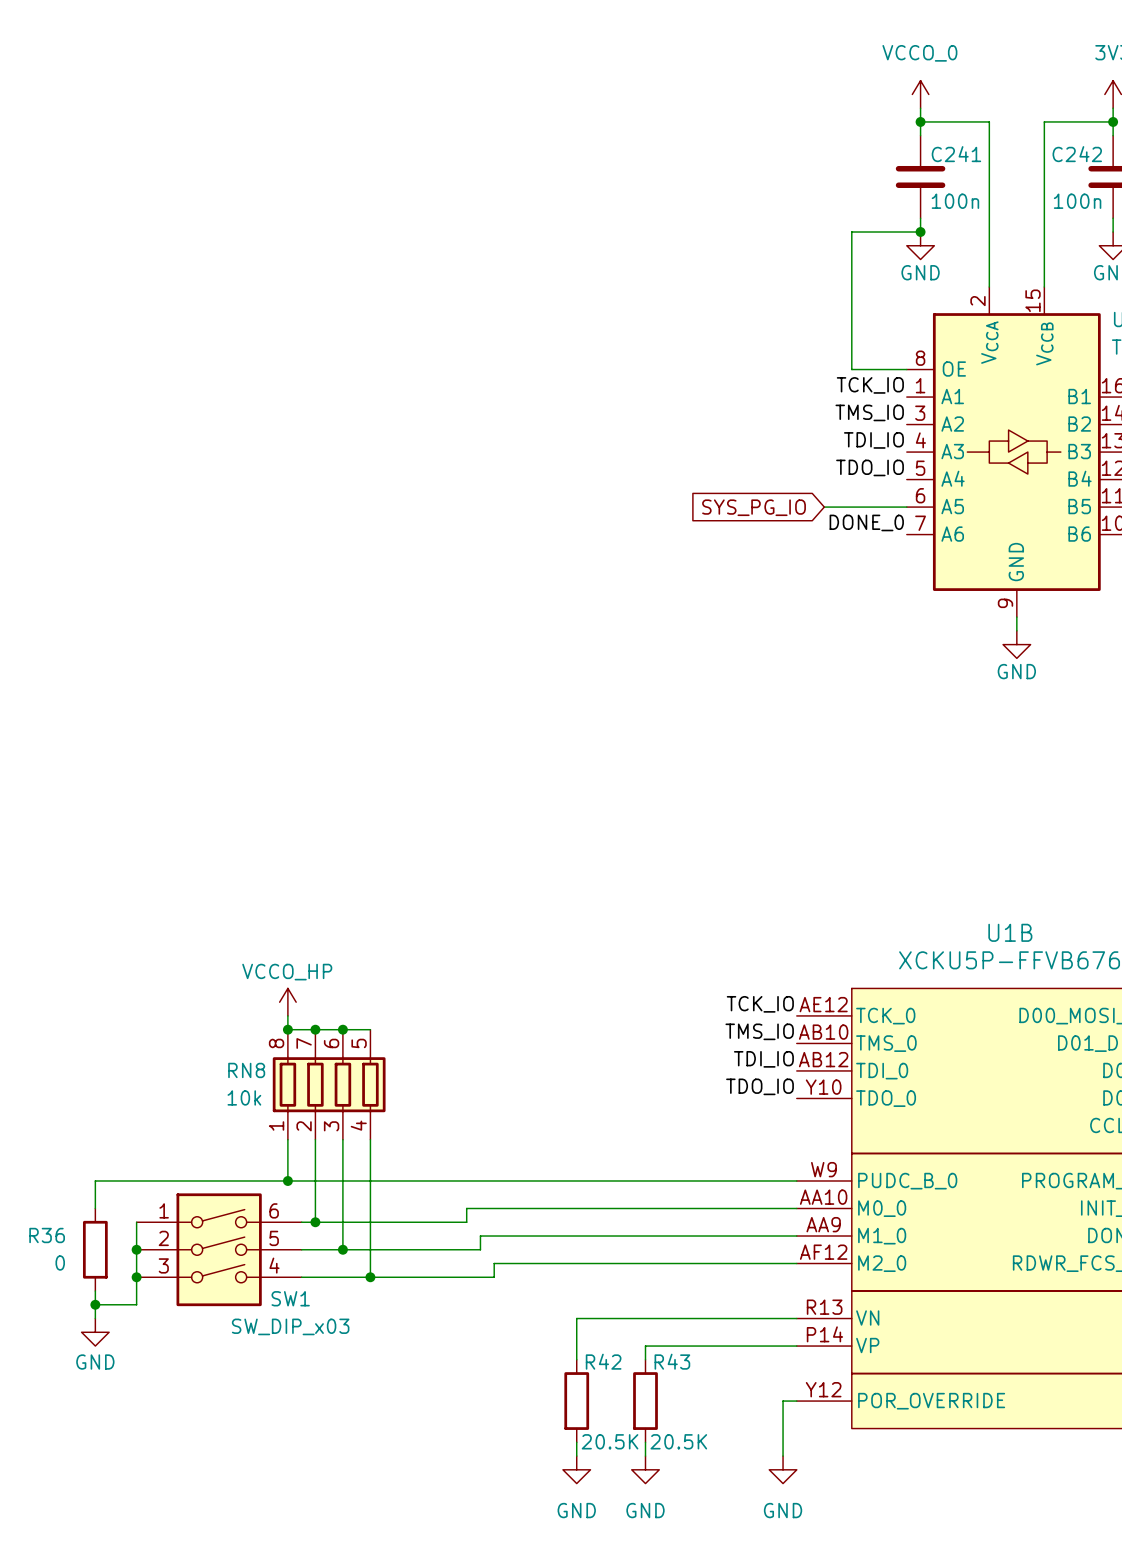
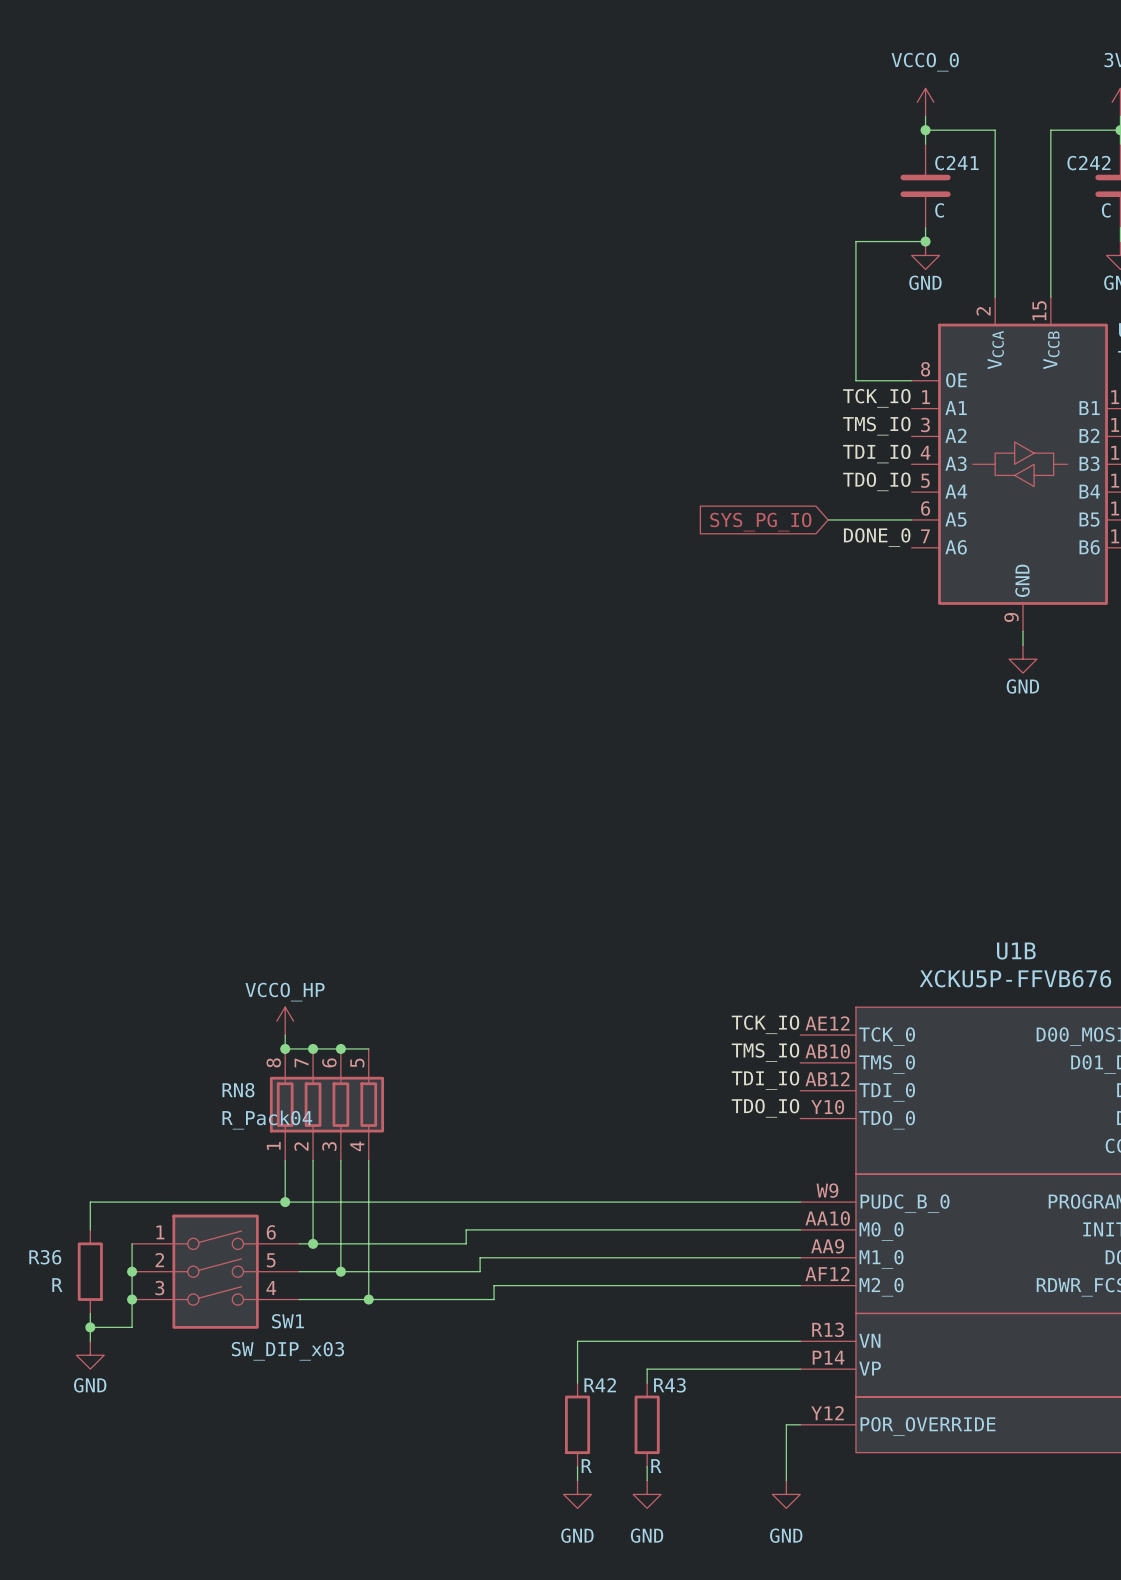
C241 value: 100n (955, 201) -> C (939, 210)
C242 value: 100n (1077, 201) -> C (1106, 210)
RN8 value: 10k (244, 1097) -> R_Pack04 (267, 1120)
R36 value: 0 (60, 1263) -> R (57, 1285)
R42 value: 20.5K (610, 1441) -> R (586, 1466)
R43 value: 20.5K (678, 1441) -> R (656, 1466)

